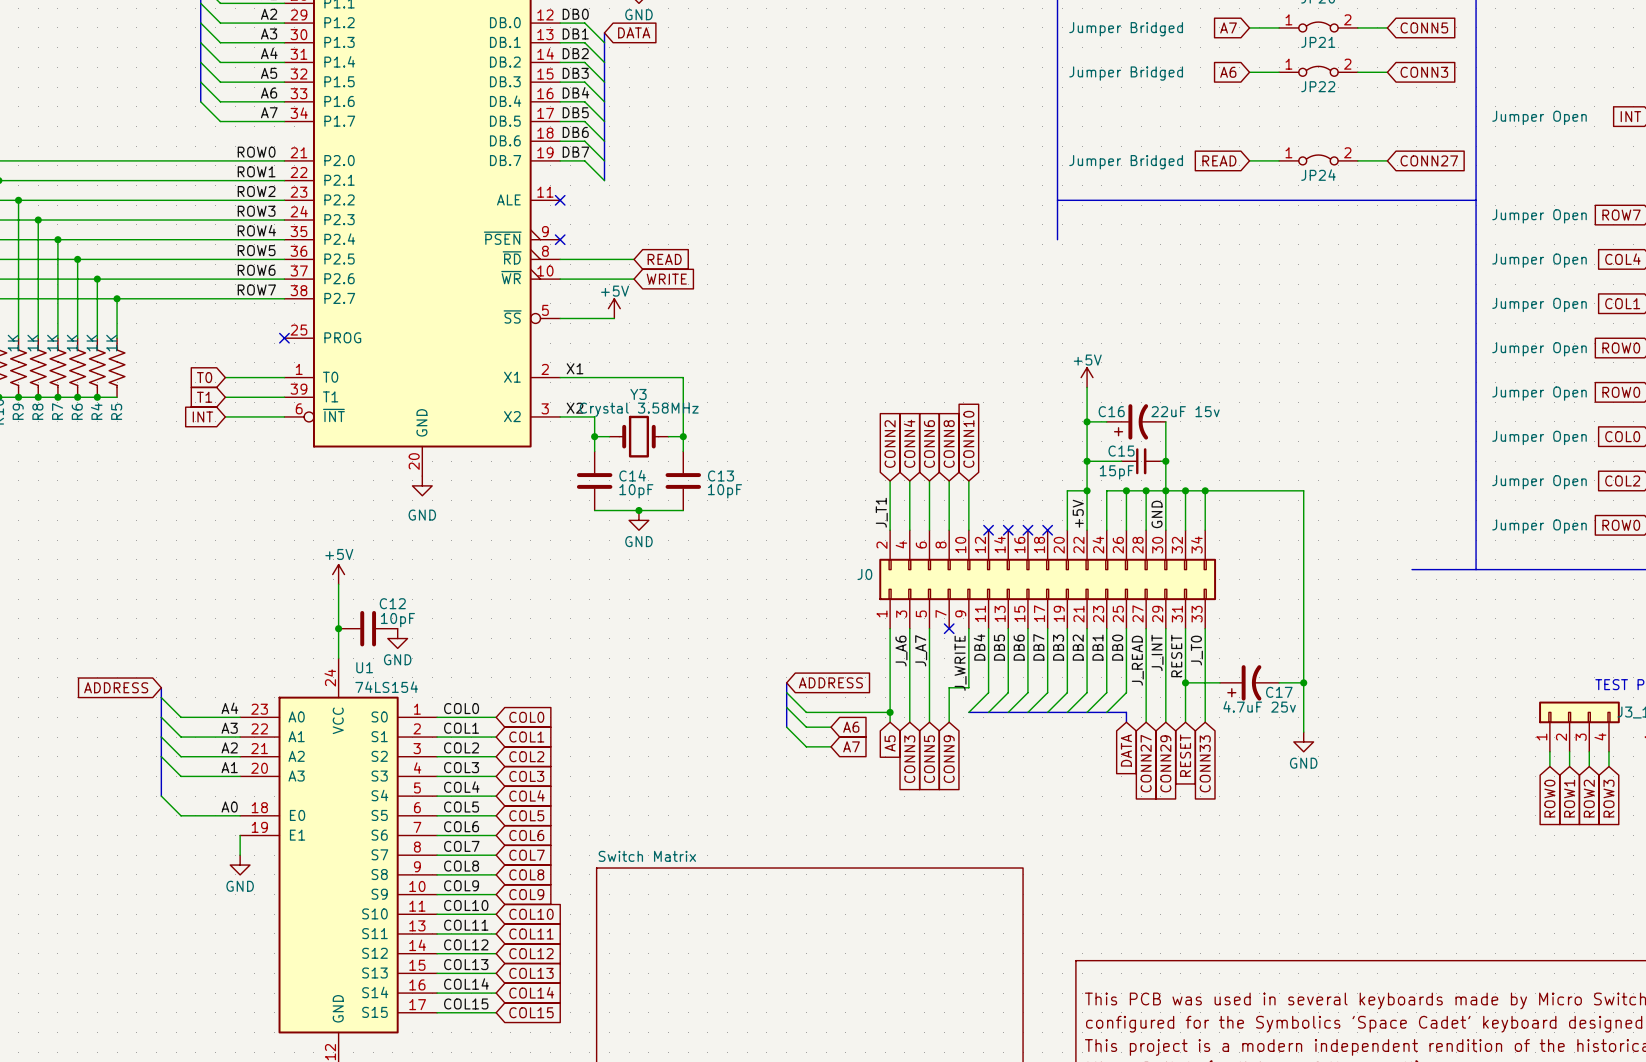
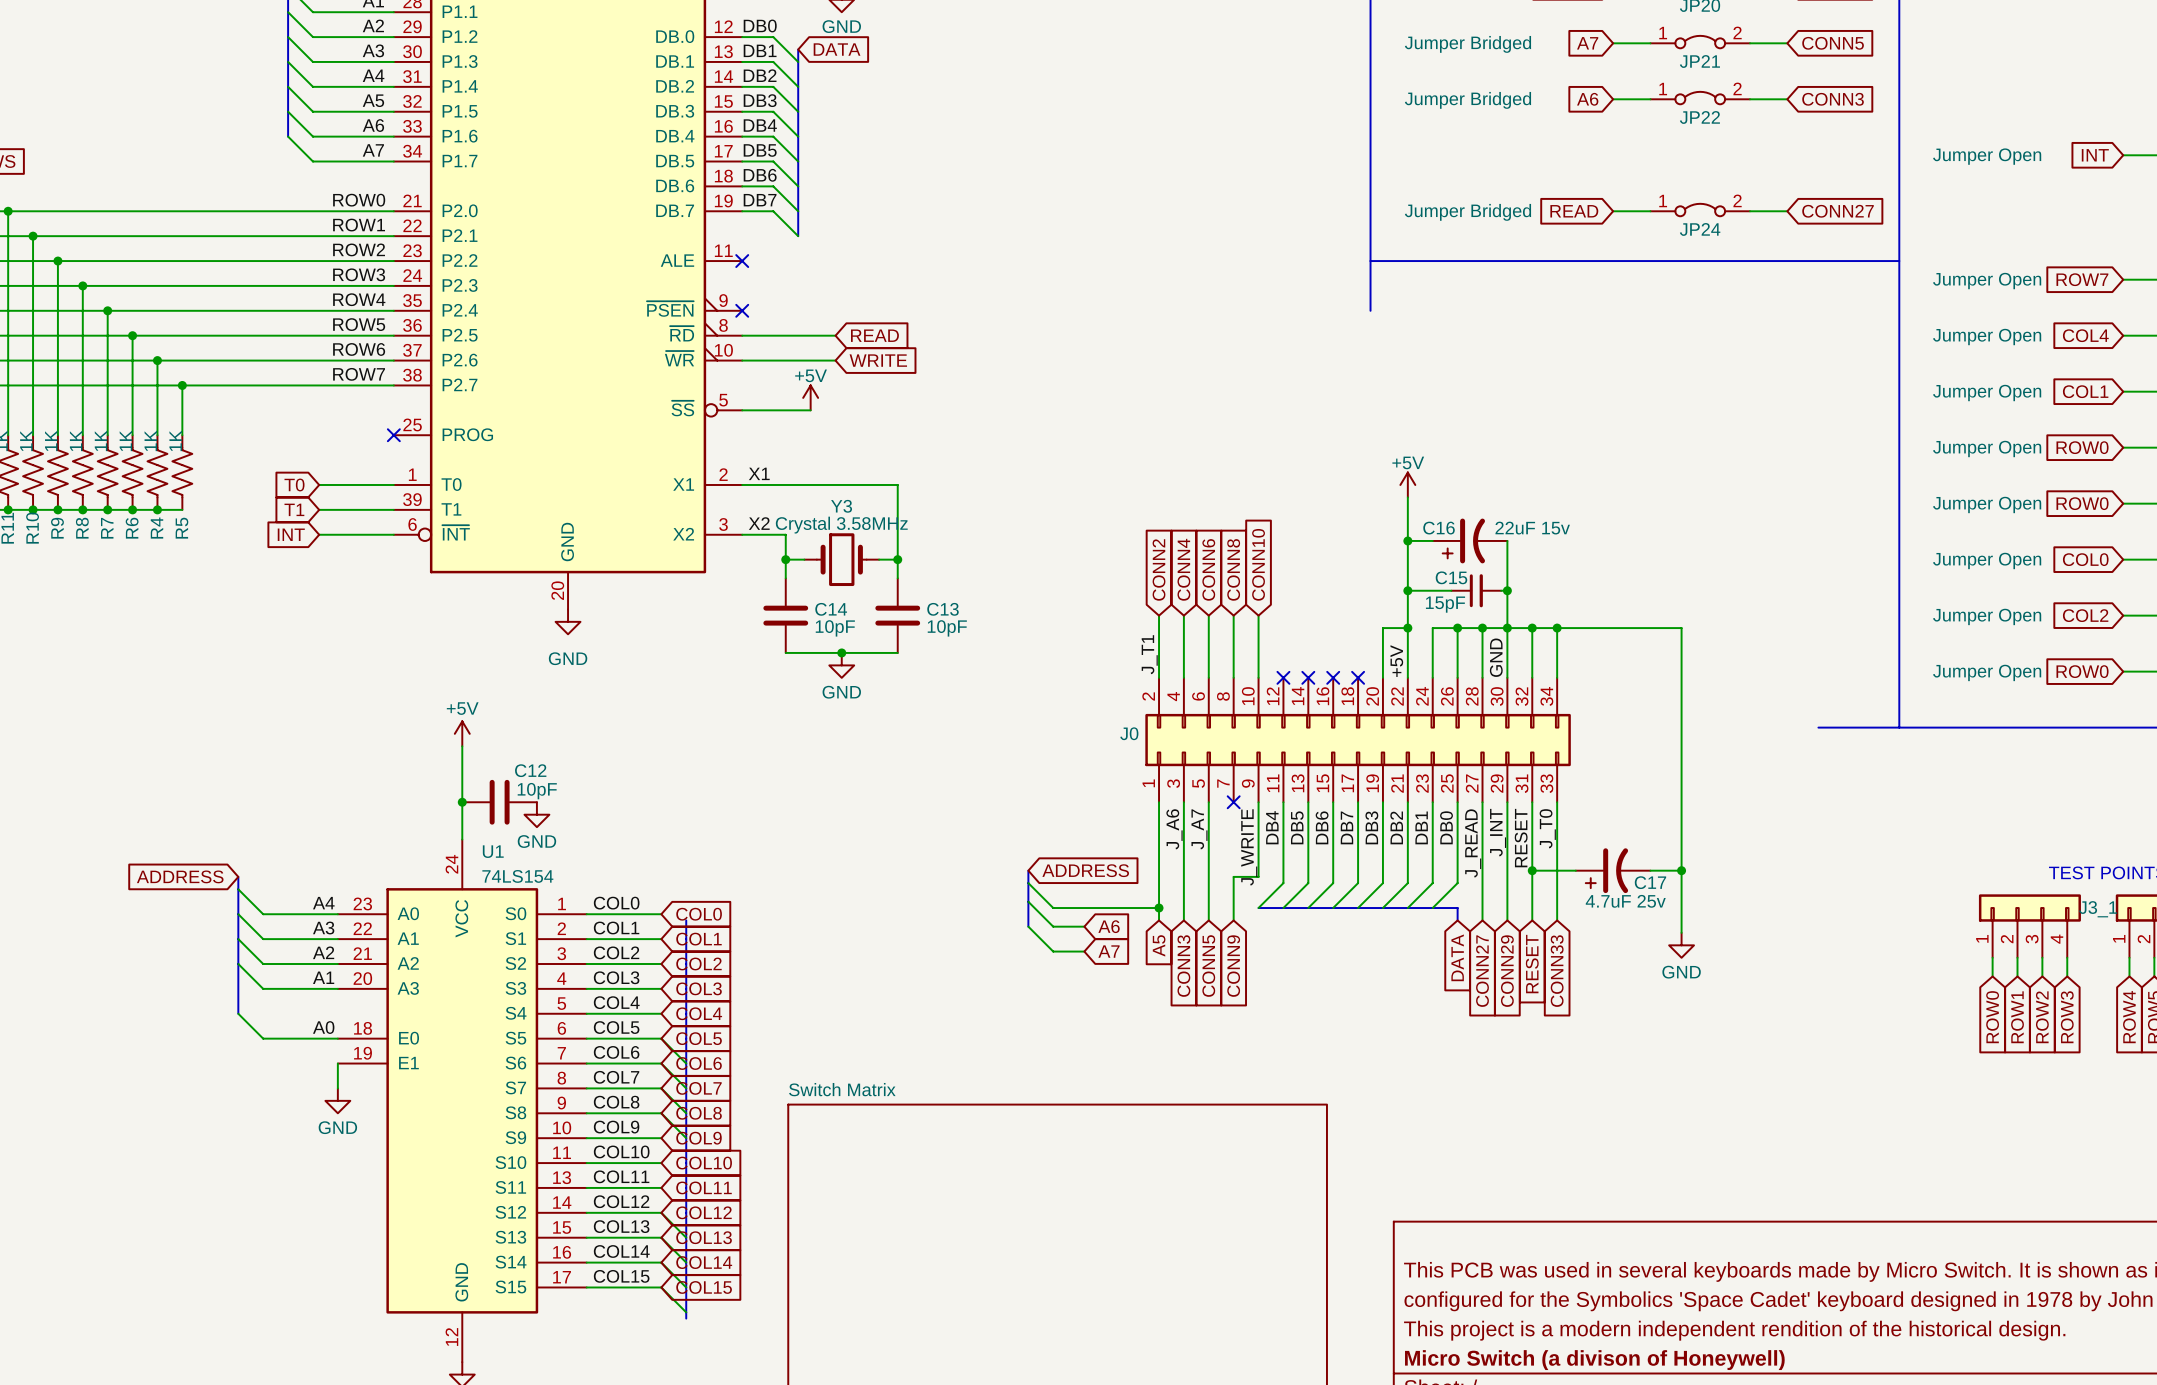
bus: none -> (686, 920) (686, 1318)
wire: none -> (661, 1038) (686, 1063)
wire: none -> (661, 1063) (686, 1088)
wire: none -> (661, 1088) (686, 1113)
wire: none -> (661, 1113) (686, 1138)
wire: none -> (661, 1212) (686, 1237)
wire: none -> (661, 1237) (686, 1262)
wire: none -> (661, 1262) (686, 1287)
wire: none -> (661, 1287) (686, 1312)

